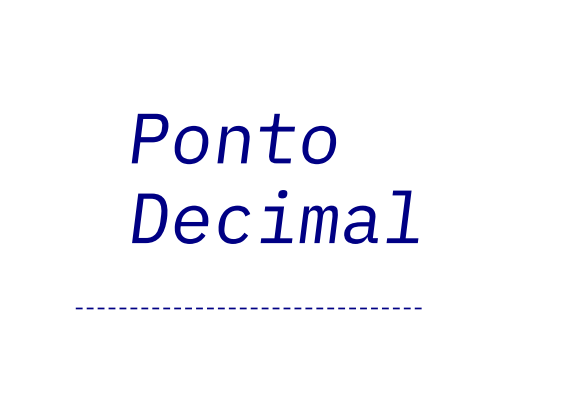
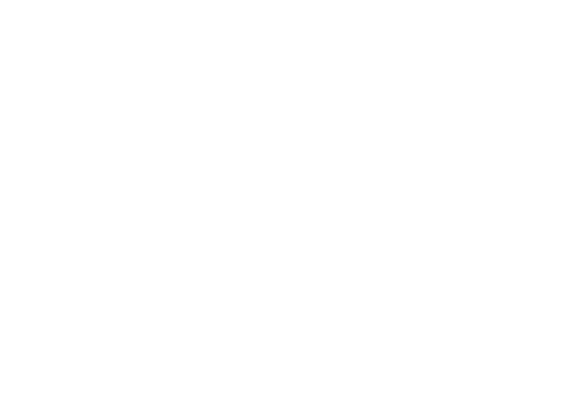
text: Ponto (234, 139) -> none
text: Decimal (275, 216) -> none
line: (75, 308) (422, 308) -> none

